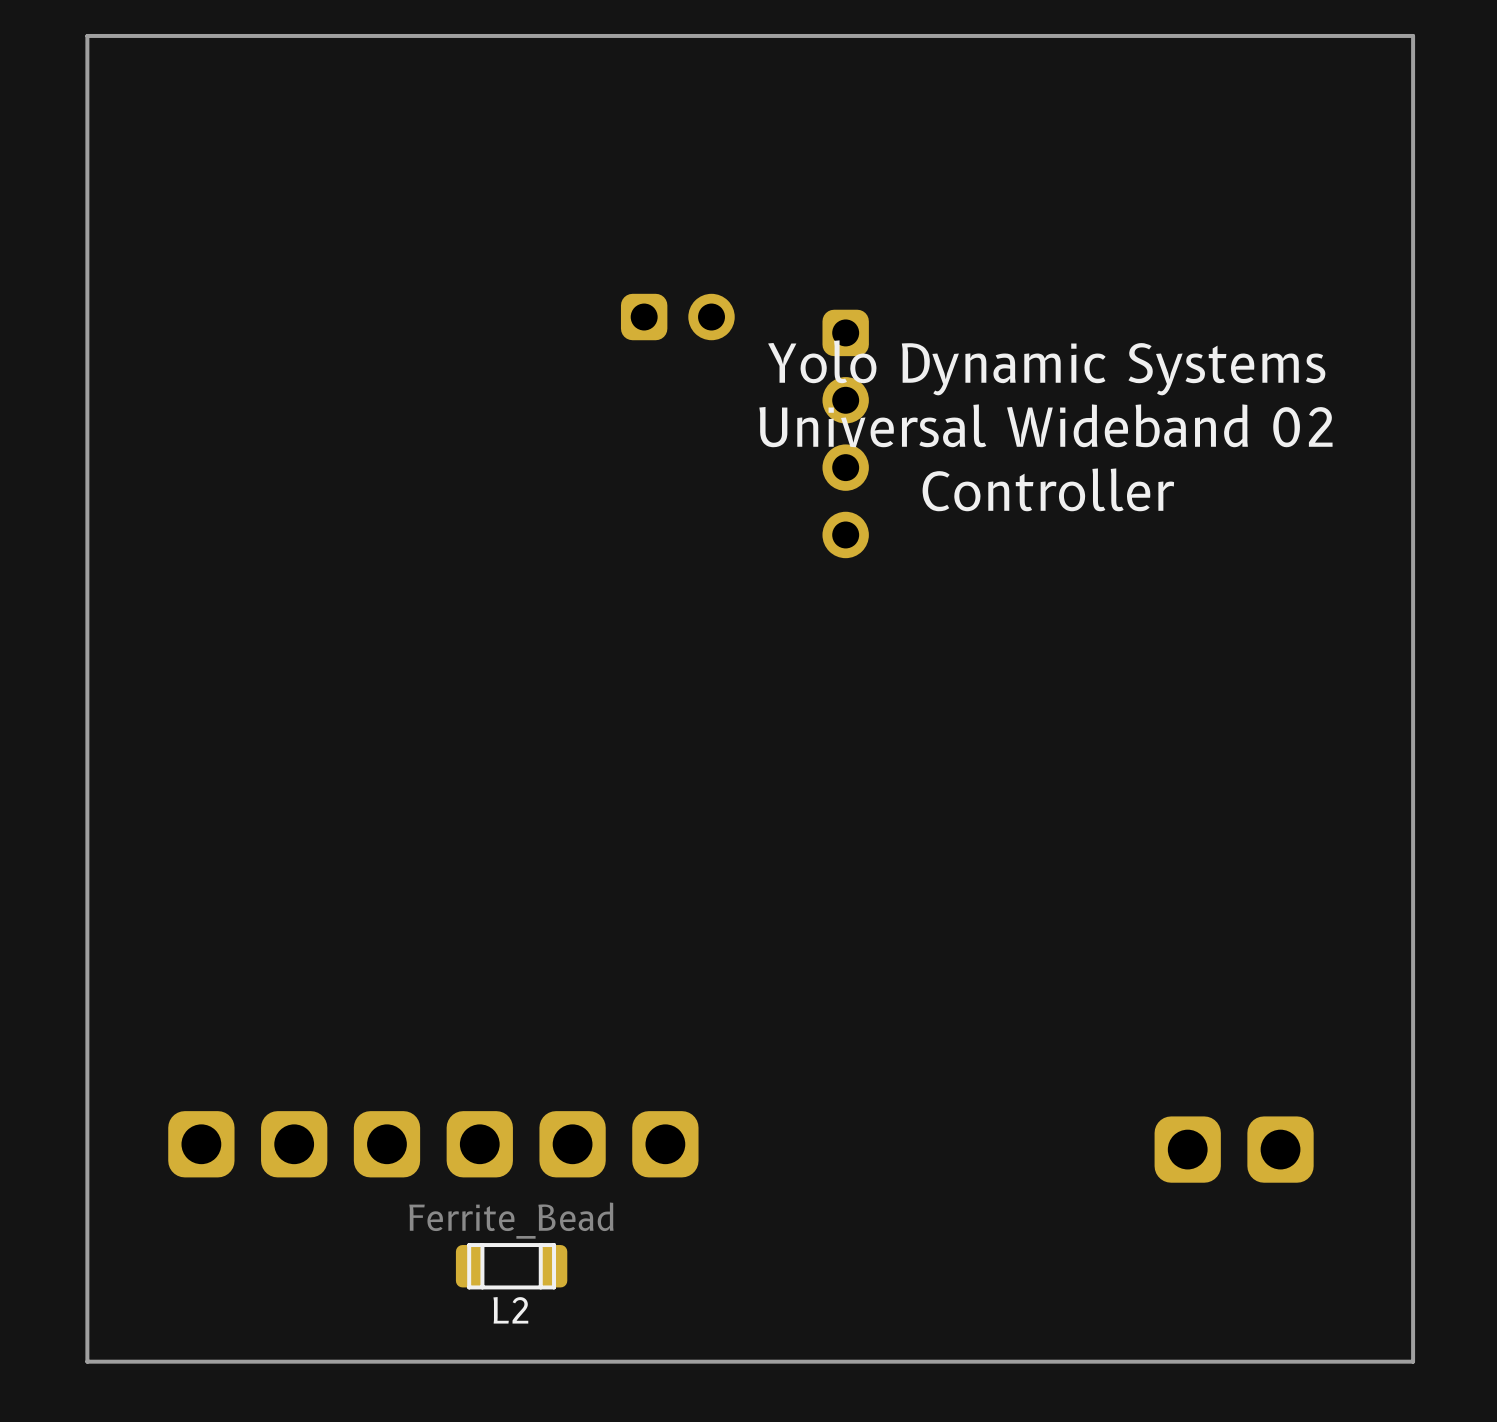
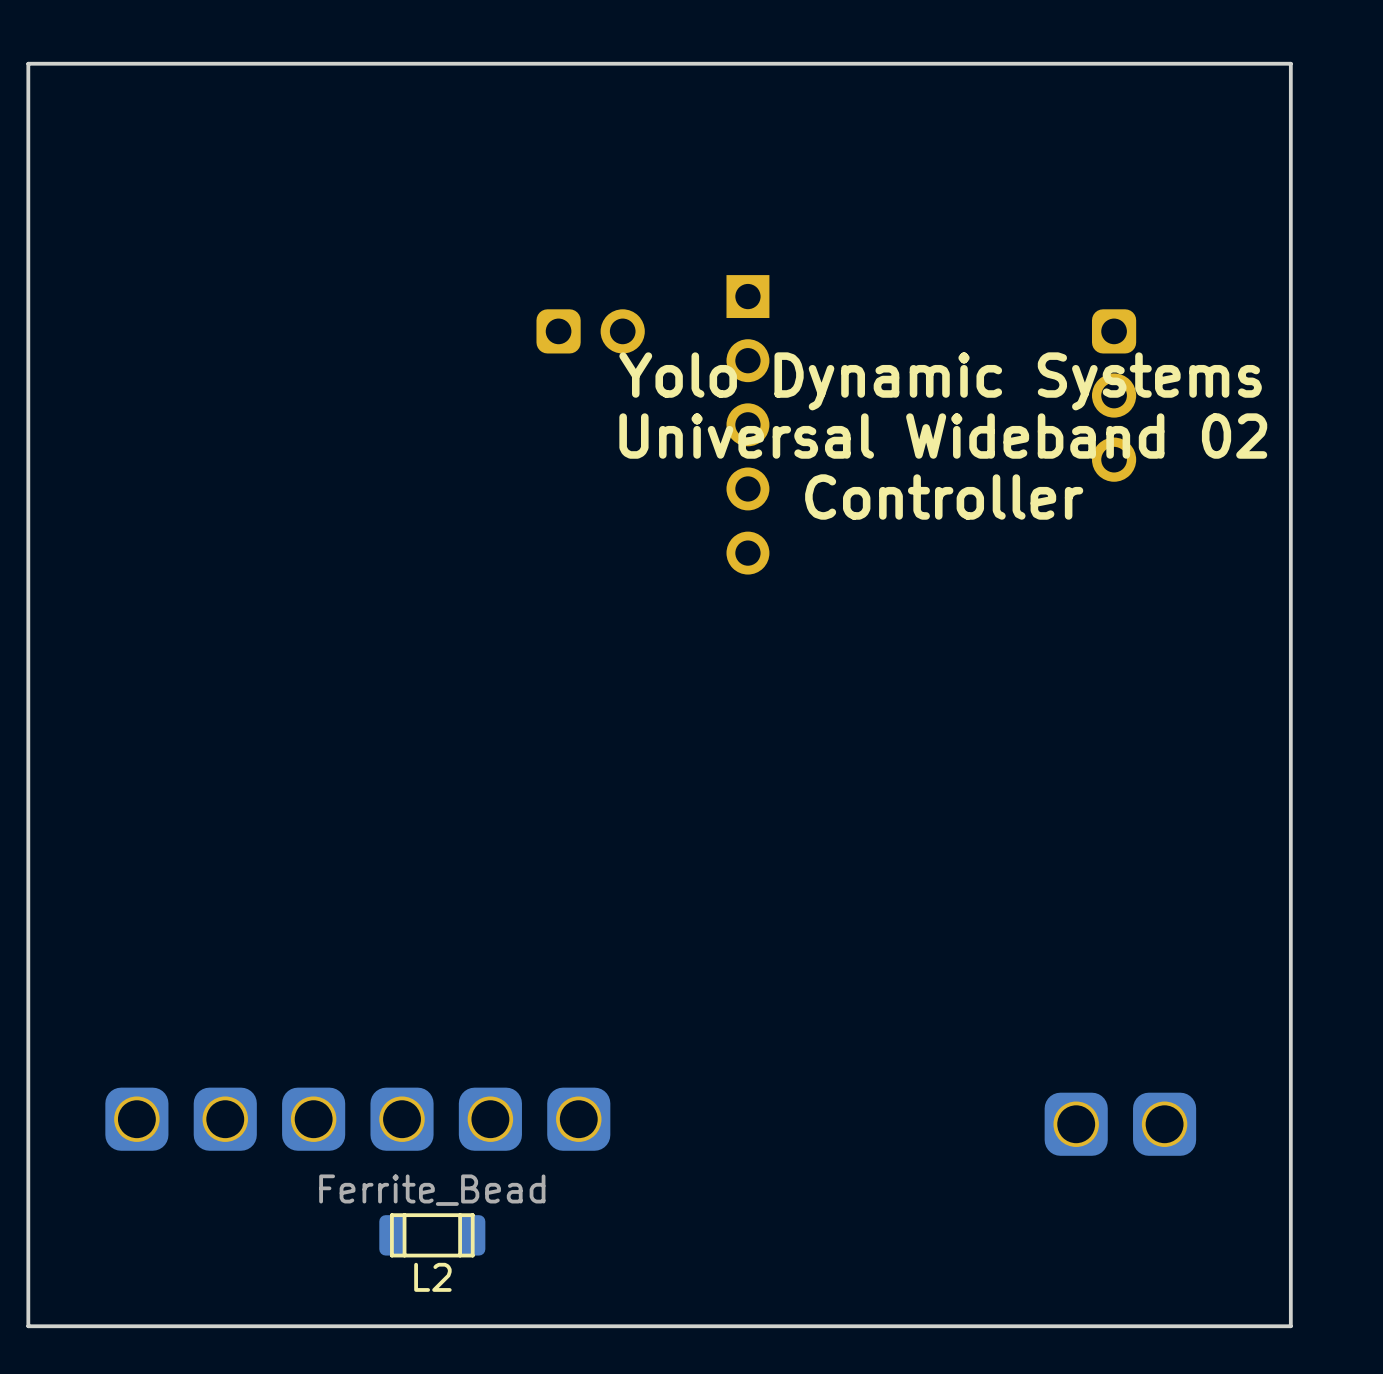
part footprint: [822, 309, 869, 559] -> [726, 275, 770, 575]
part: none -> (1114, 395)

